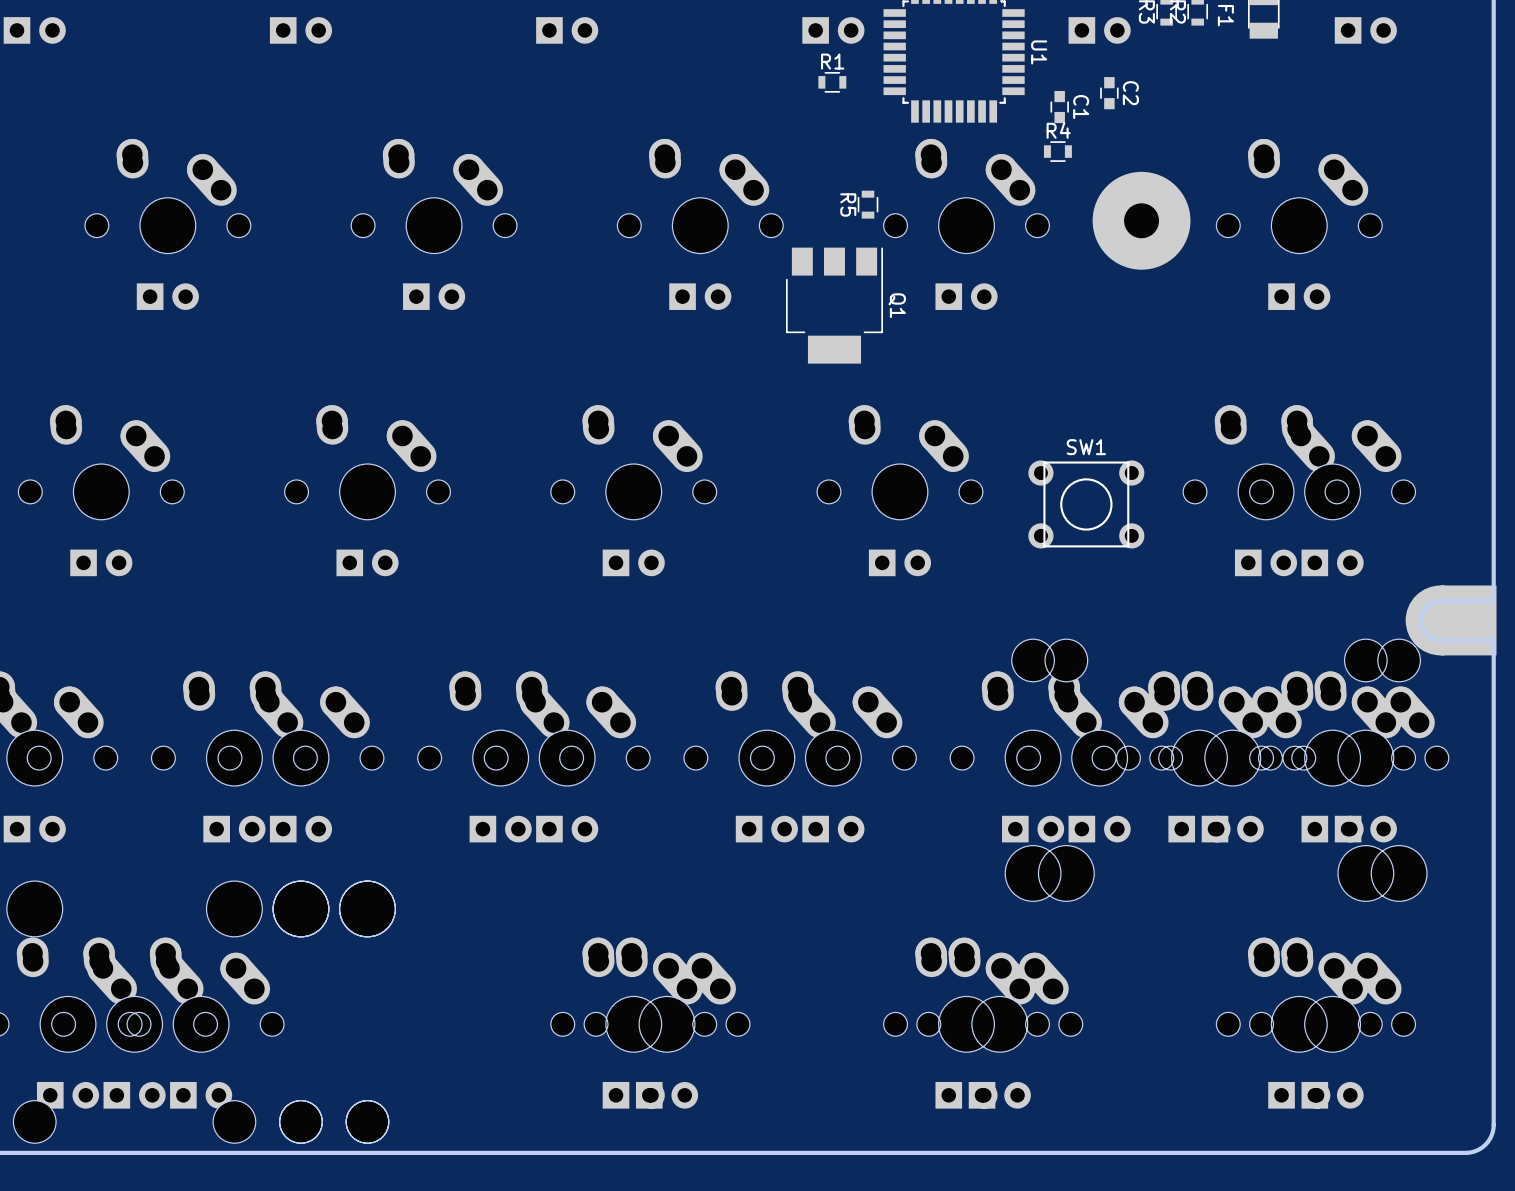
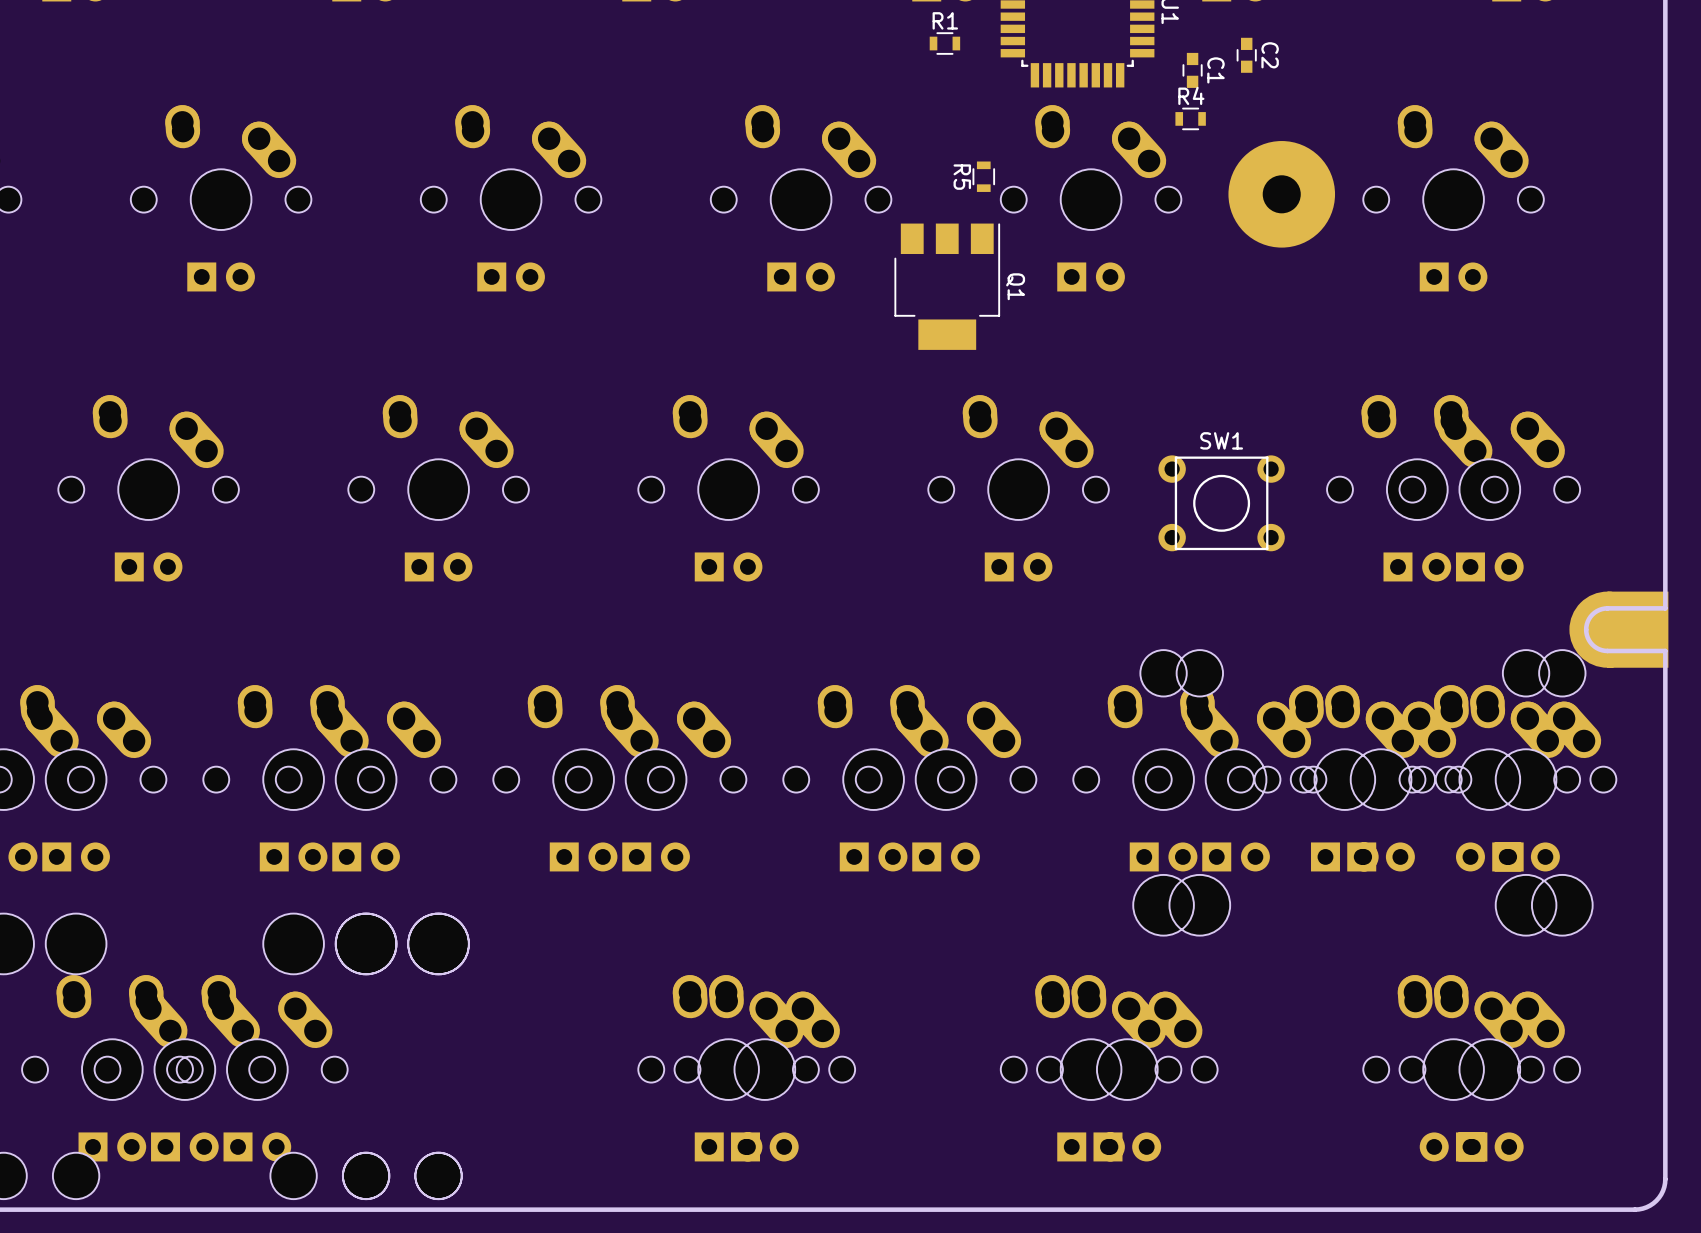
part footprint: [1249, 671, 1416, 843] -> [1399, 685, 1581, 872]
part footprint: [1216, 937, 1383, 1109] -> [1363, 975, 1544, 1162]

